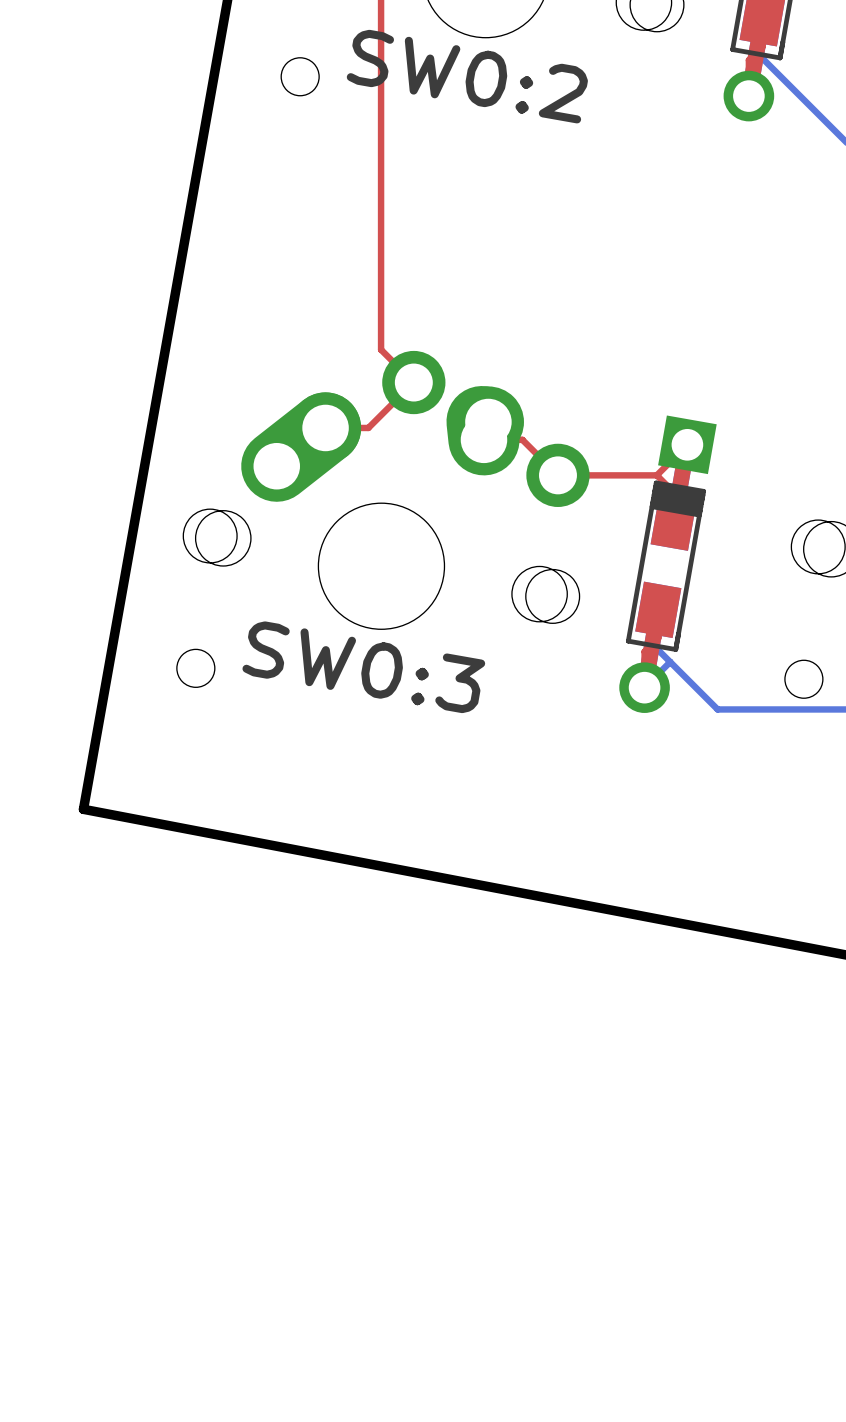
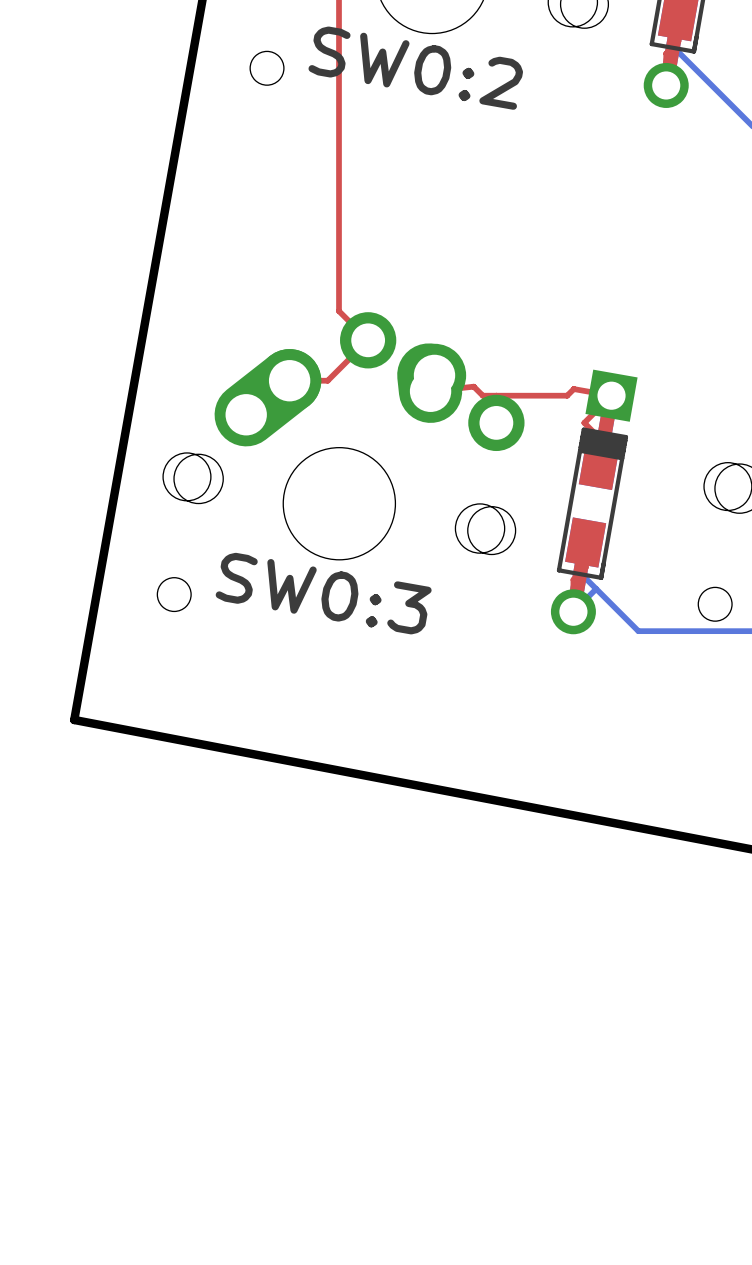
top track: (483, 439) (522, 439) (557, 475) (656, 475) -> (430, 391) (473, 386) (482, 395) (567, 395) (573, 389) (611, 395) (611, 384) (614, 381) (604, 434) (599, 439)

